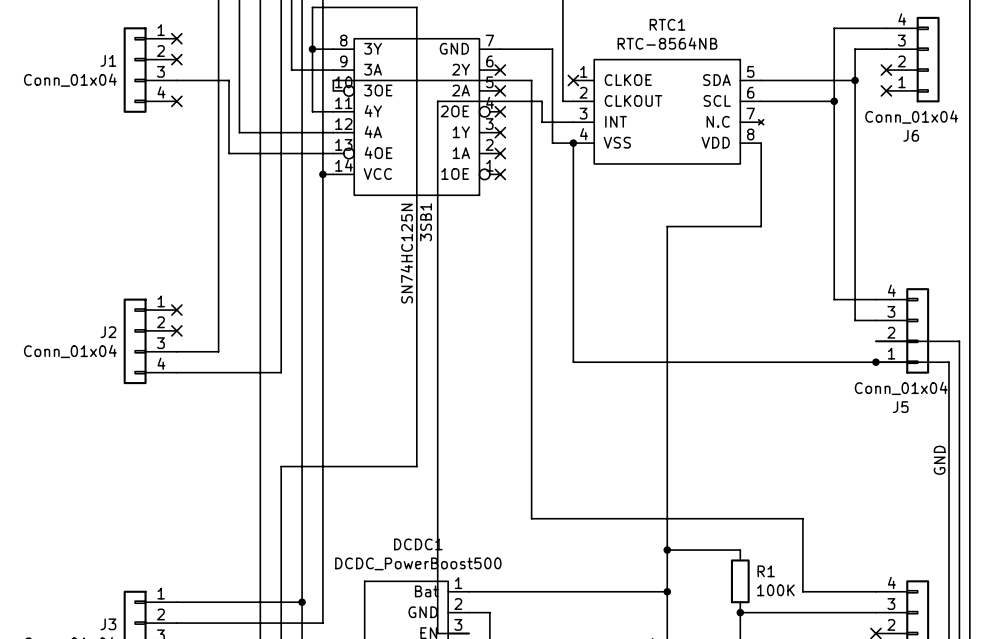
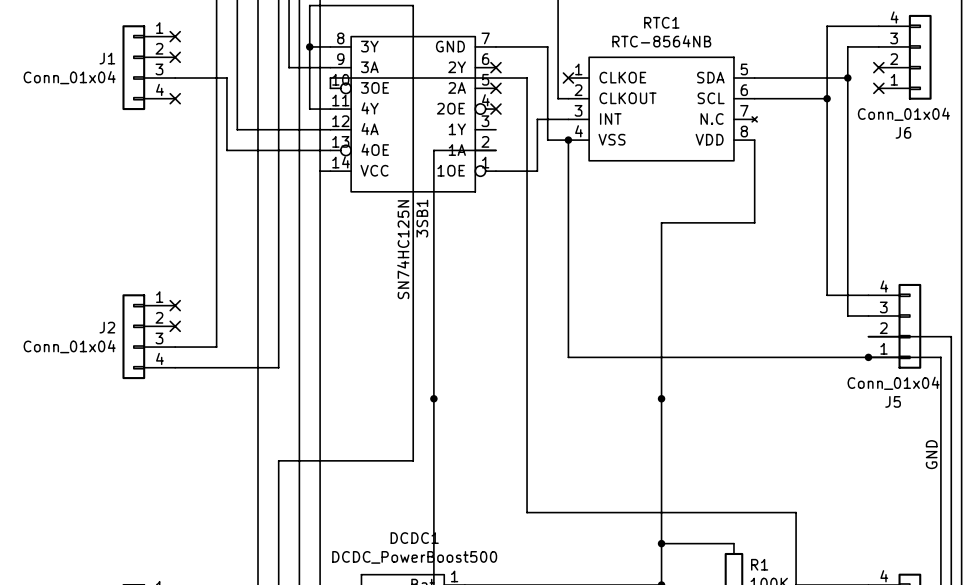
wire: (542, 122) (542, 101) (437, 101) (437, 153) -> (495, 150) (433, 150)
wire: none -> (537, 119) (537, 171) (495, 171)
no-connect mark: (500, 132) -> none
no-connect mark: (500, 153) -> none
junction: (322, 174) -> none
no-connect mark: (500, 174) -> none
junction: none -> (433, 398)
junction: none -> (661, 398)

